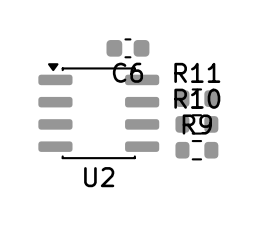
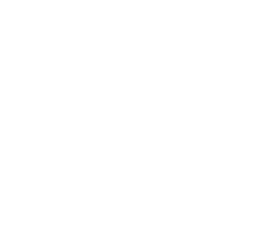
C6: (127, 48) -> none
R11: (196, 98) -> none
U2: (98, 111) -> none
R10: (196, 124) -> none
R9: (196, 150) -> none

